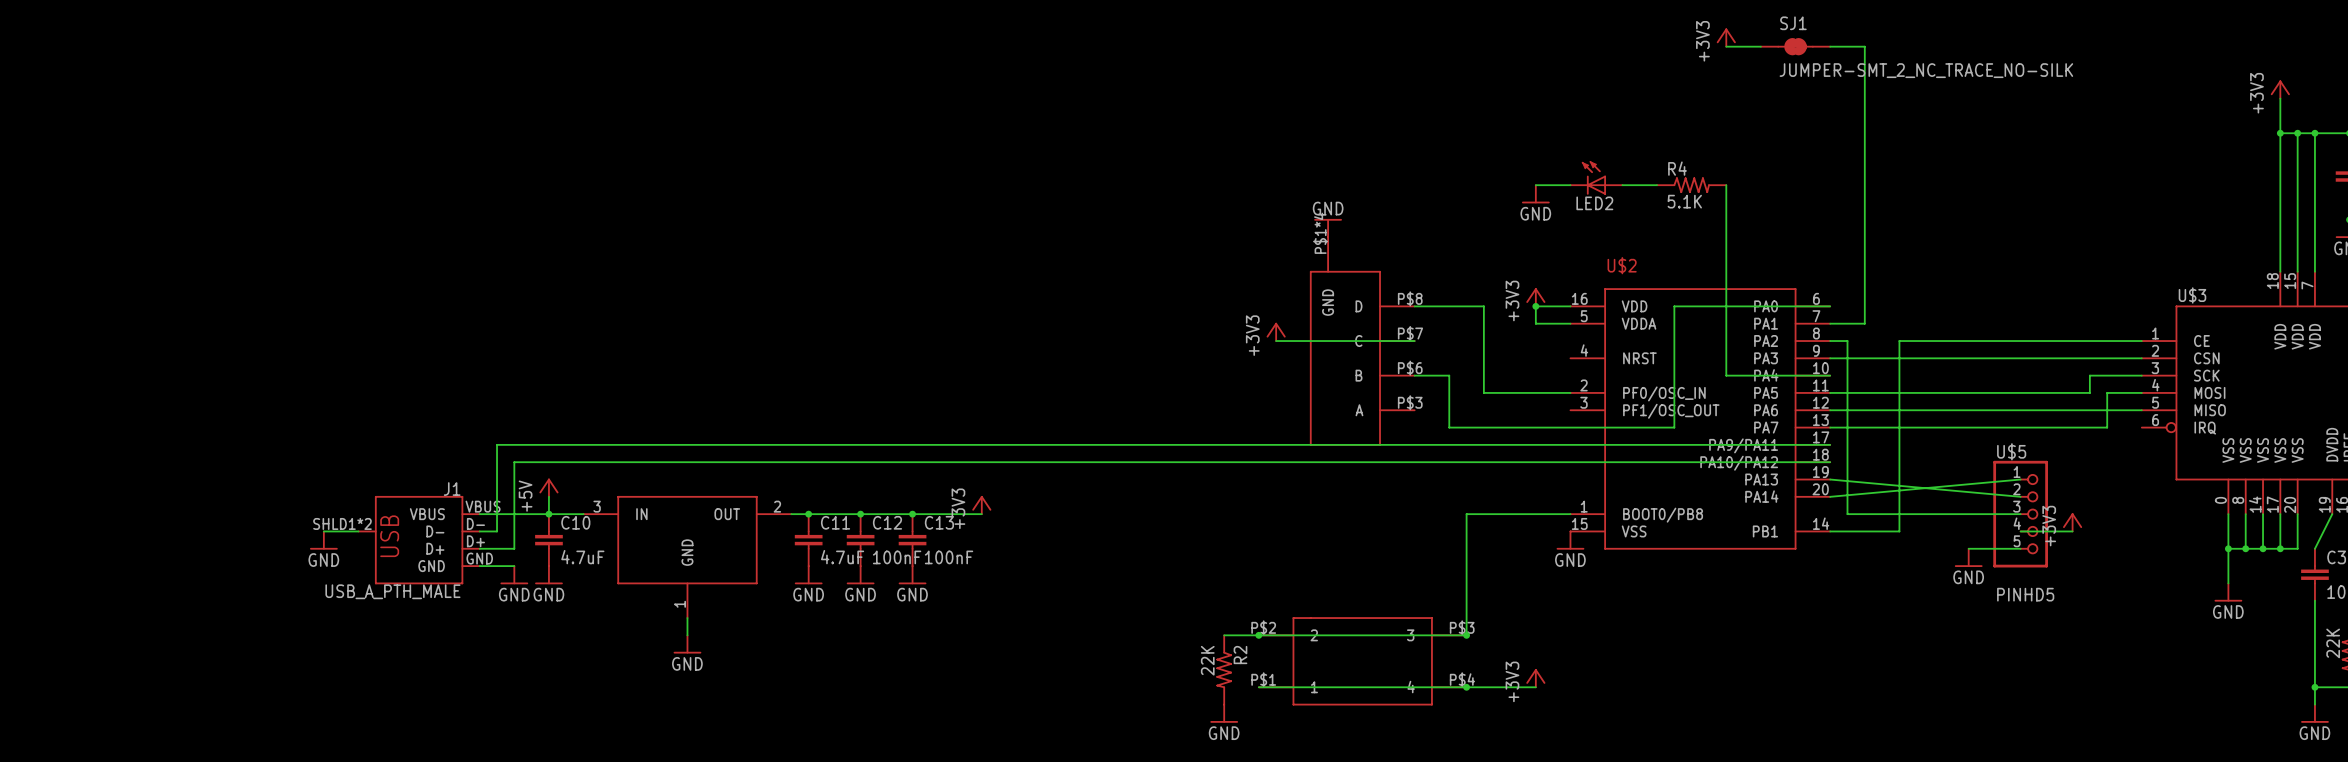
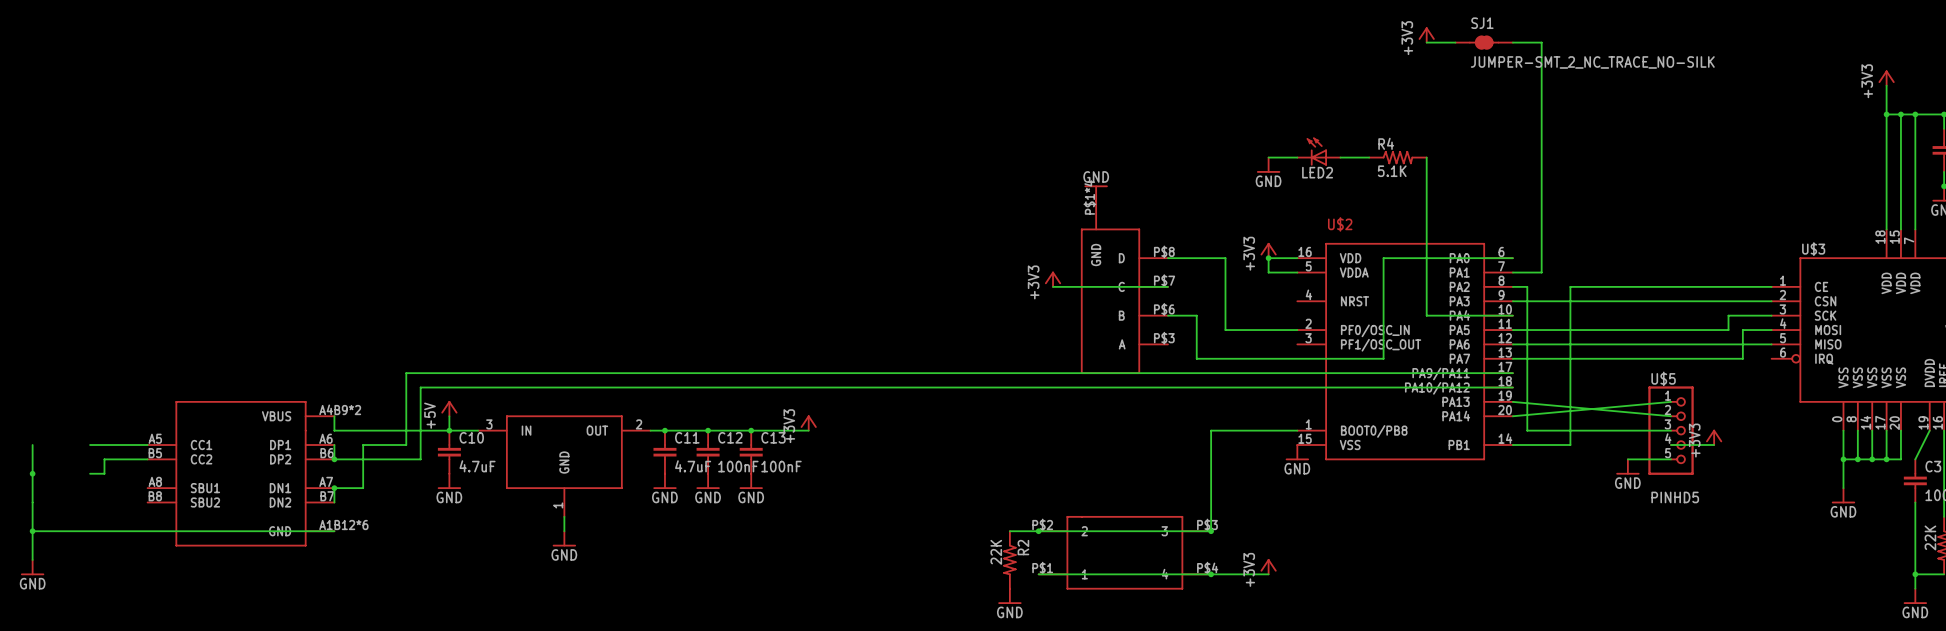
wire: none -> (334, 416) (334, 430) (391, 430)
wire: none -> (32, 445) (32, 559)
wire: none -> (90, 445) (147, 445)
wire: (323, 531) (358, 531) -> none
wire: none -> (334, 445) (334, 459) (391, 459)
wire: none -> (391, 445) (363, 445) (363, 488) (334, 488) (334, 502)
power symbol: GND (323, 540) -> none
J1: USB_A_PTH_MALE (419, 540) -> none
wire: none -> (147, 459) (104, 459) (104, 473) (90, 473)
junction: none -> (334, 459)
junction: none -> (32, 473)
part: none -> (241, 473)
wire: (479, 566) (514, 566) -> none
power symbol: GND (514, 575) -> none
junction: none -> (334, 488)
wire: none -> (32, 531) (334, 531)
junction: none -> (32, 531)
power symbol: none -> GND (32, 567)

